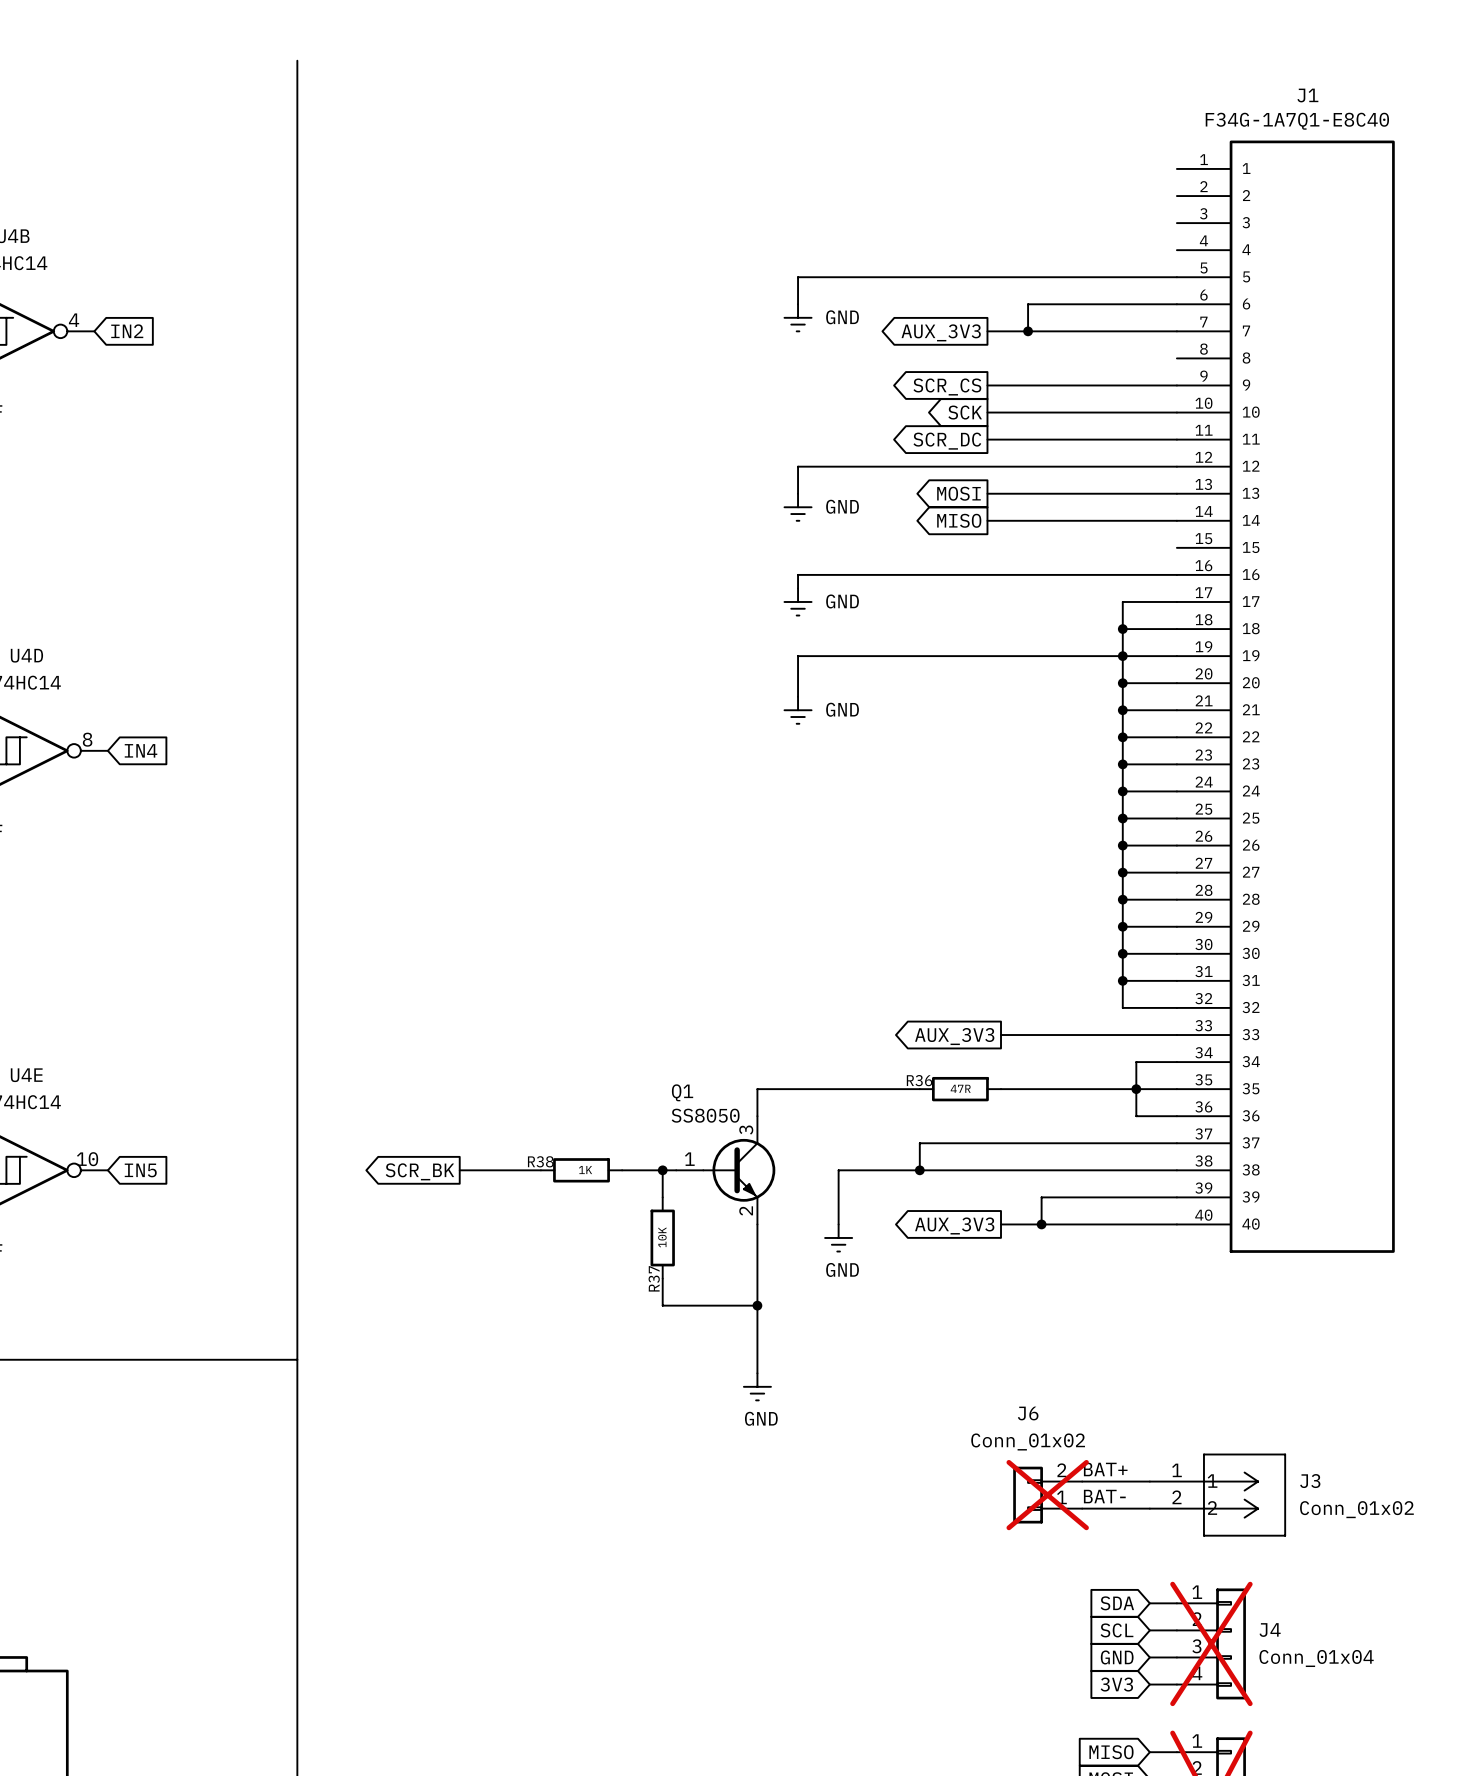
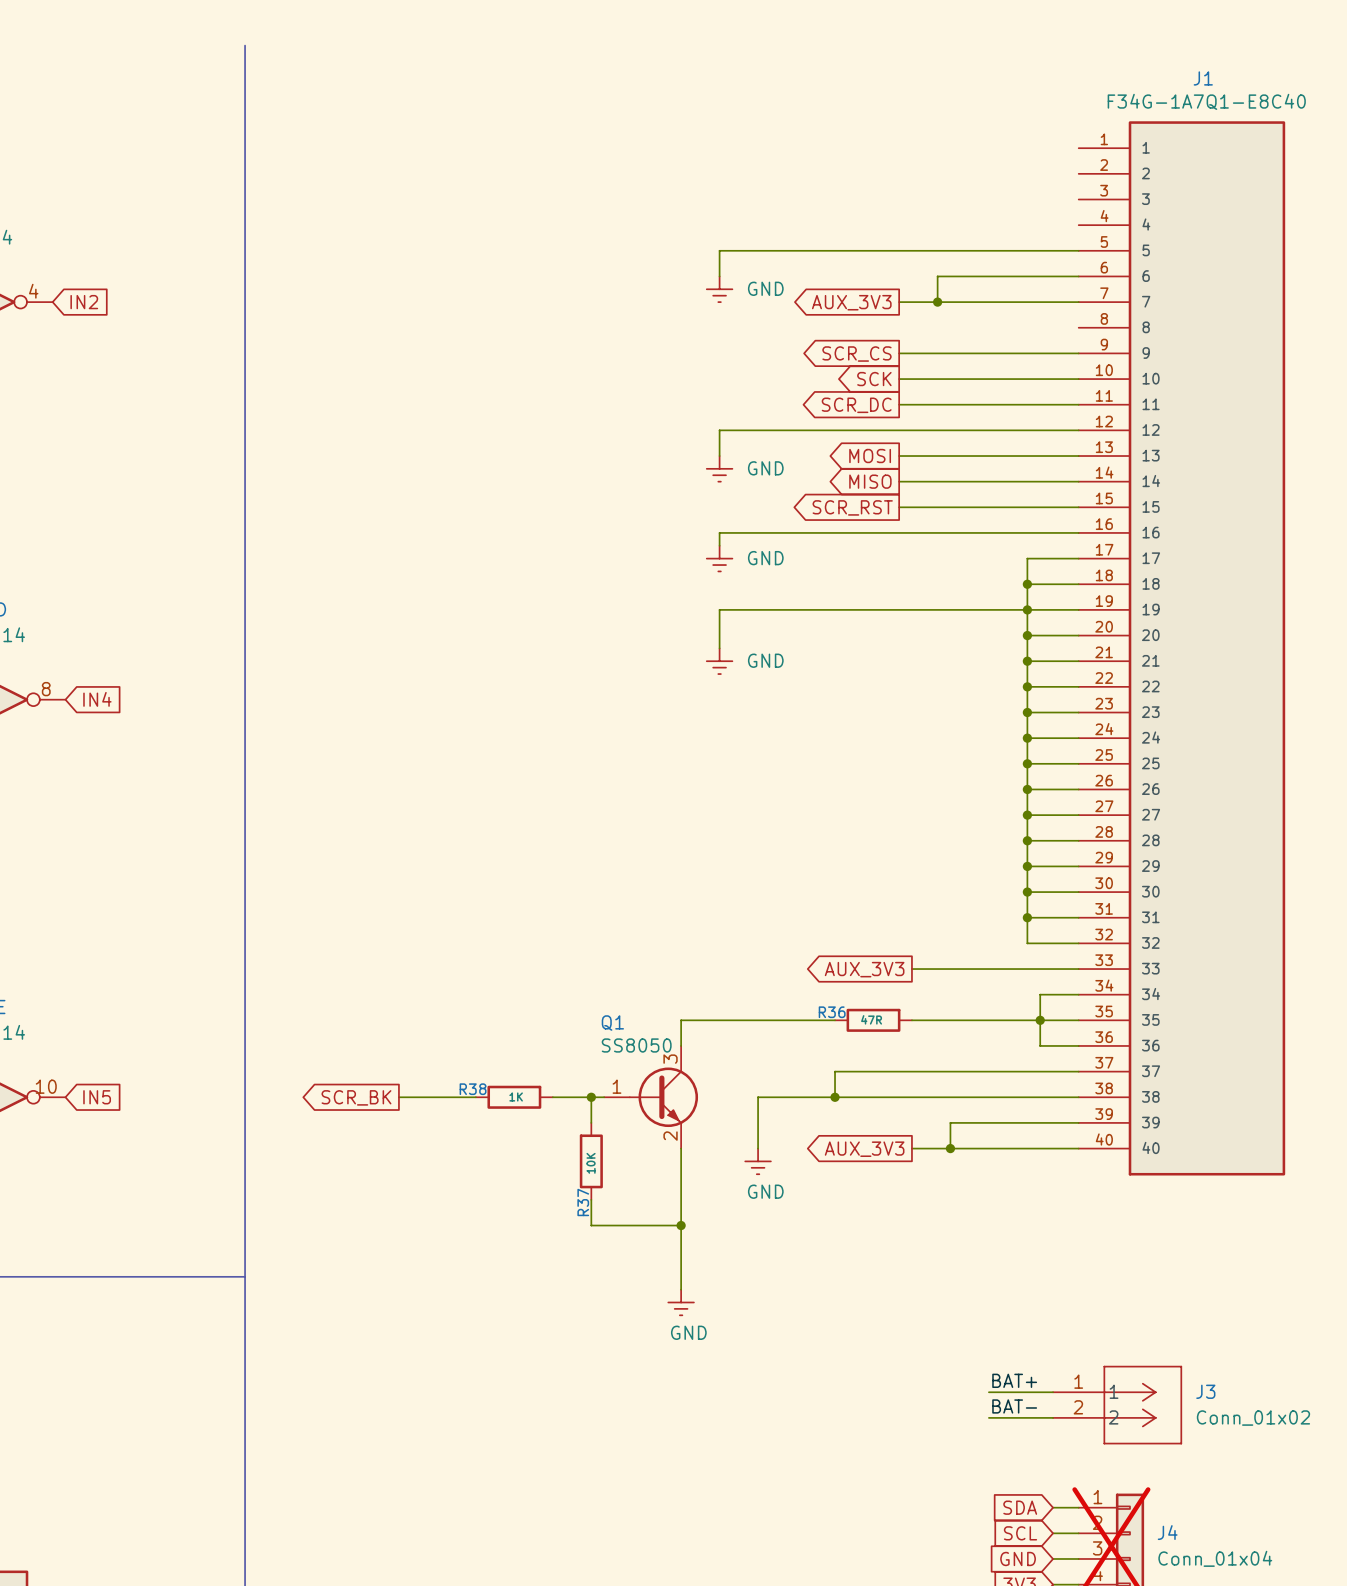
wire: none -> (899, 507) (1078, 507)
global label: none -> SCR_RST (852, 507)
J6: Conn_01x02 (1047, 1495) -> none

